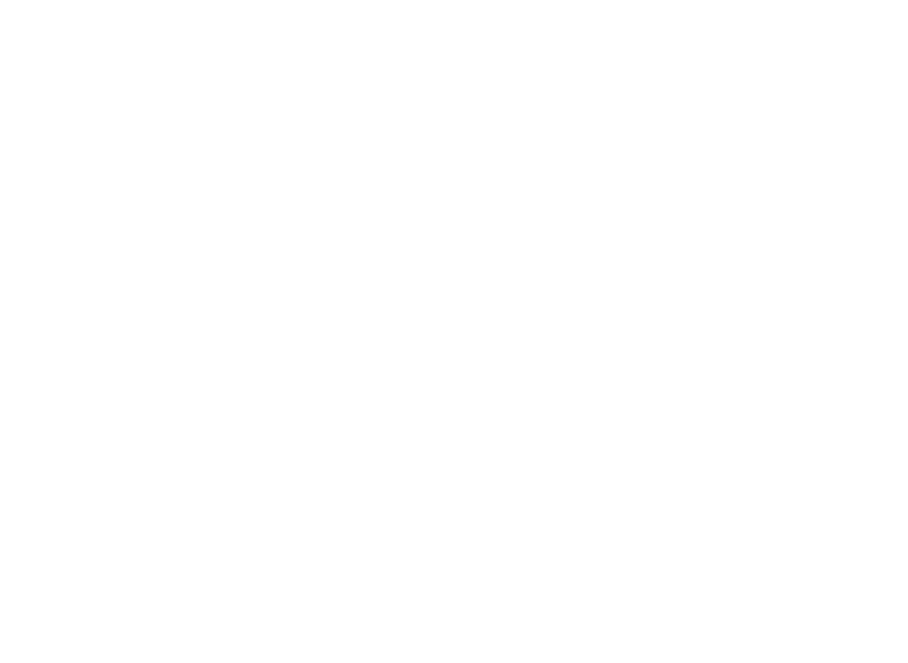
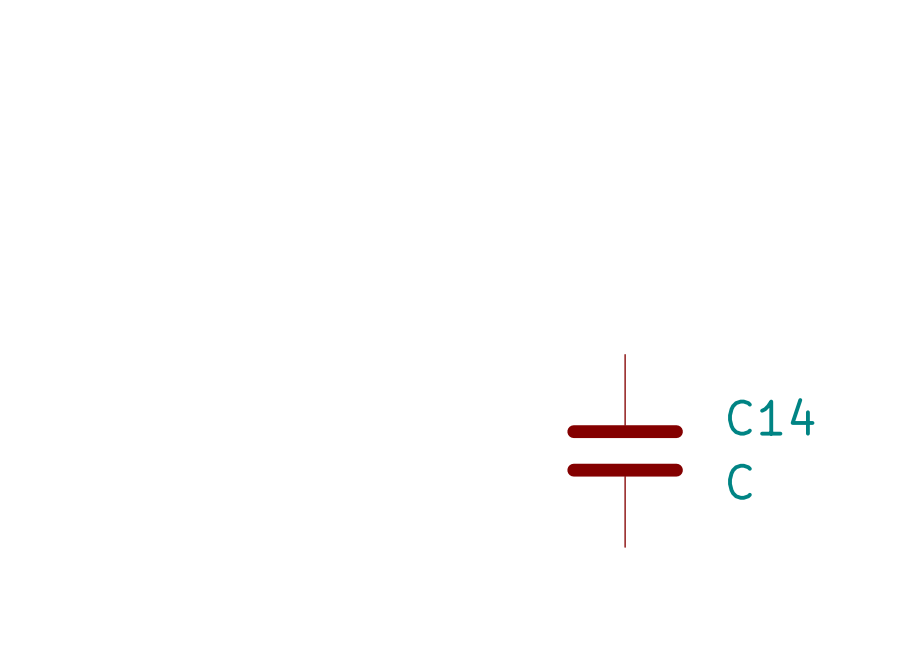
C14: none -> C (625, 450)

